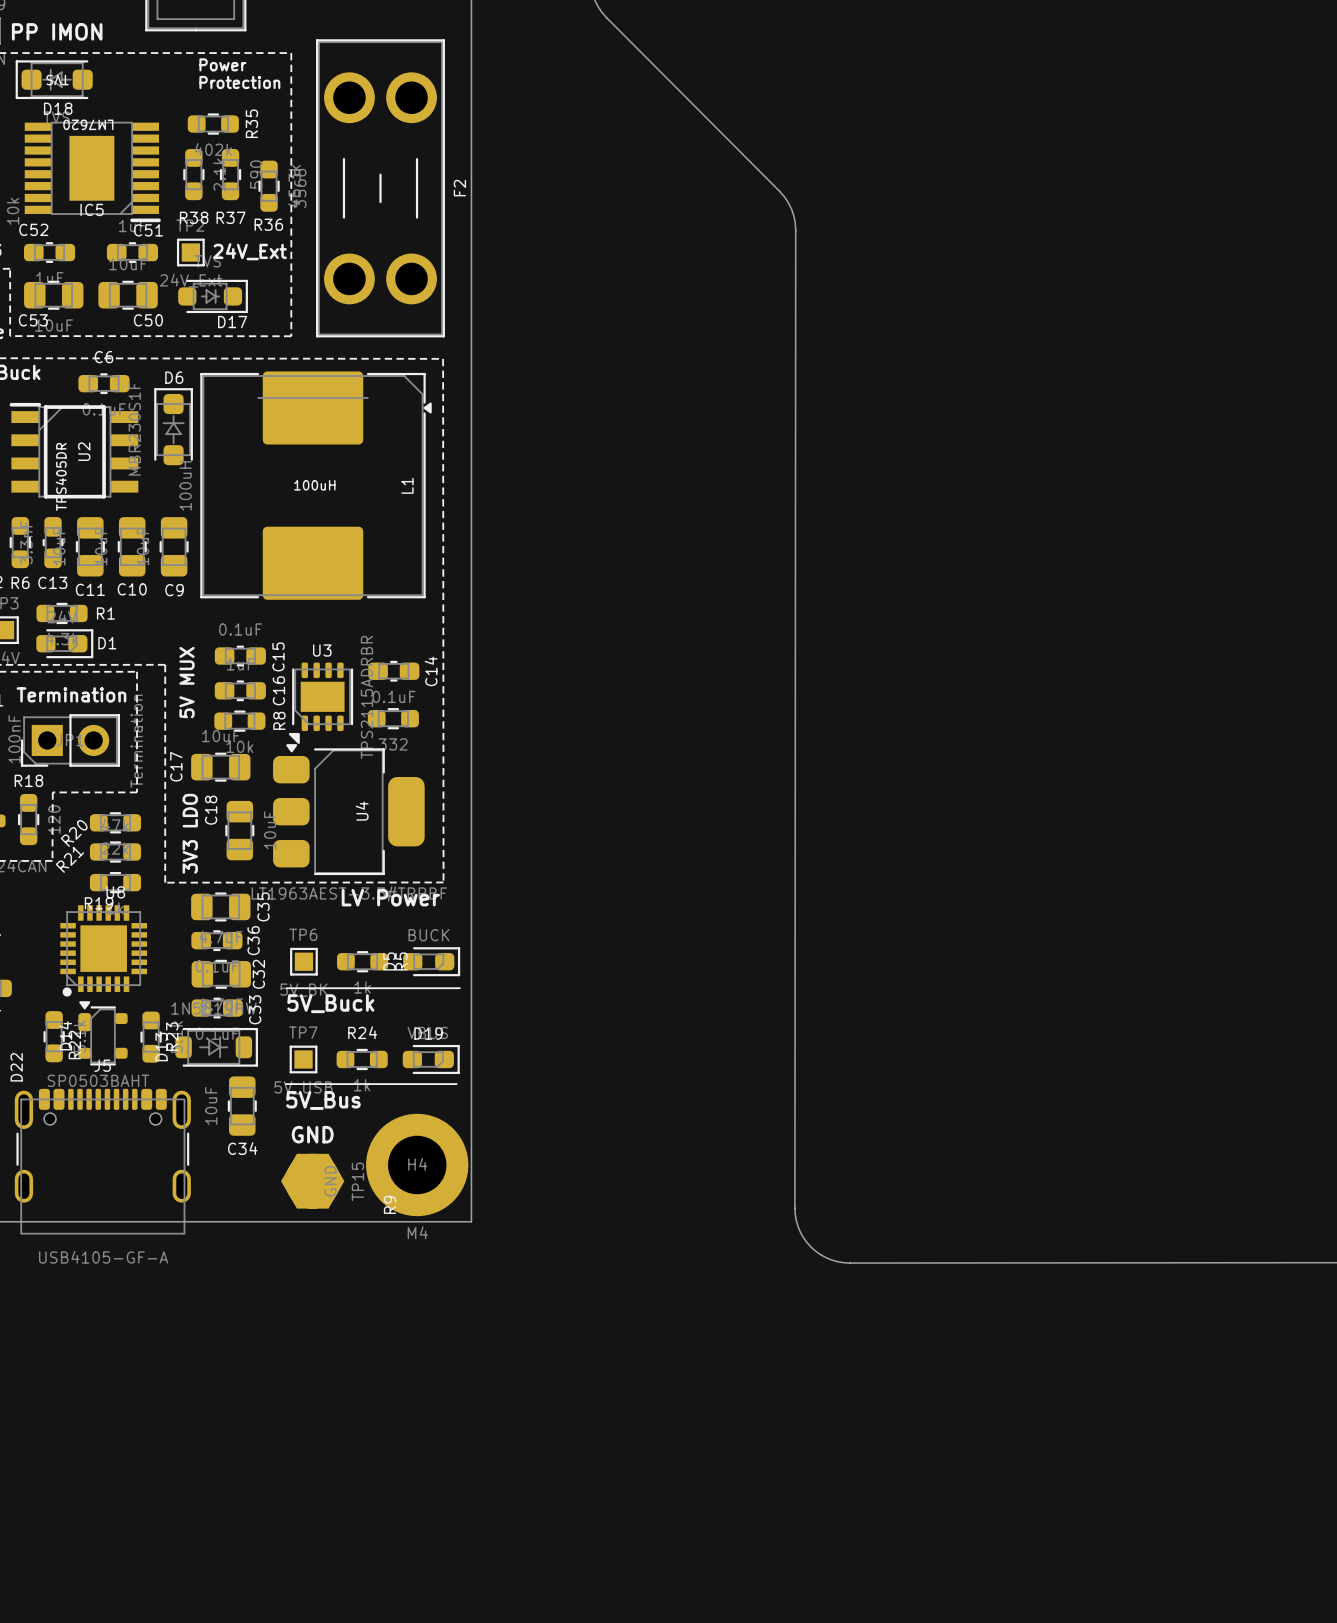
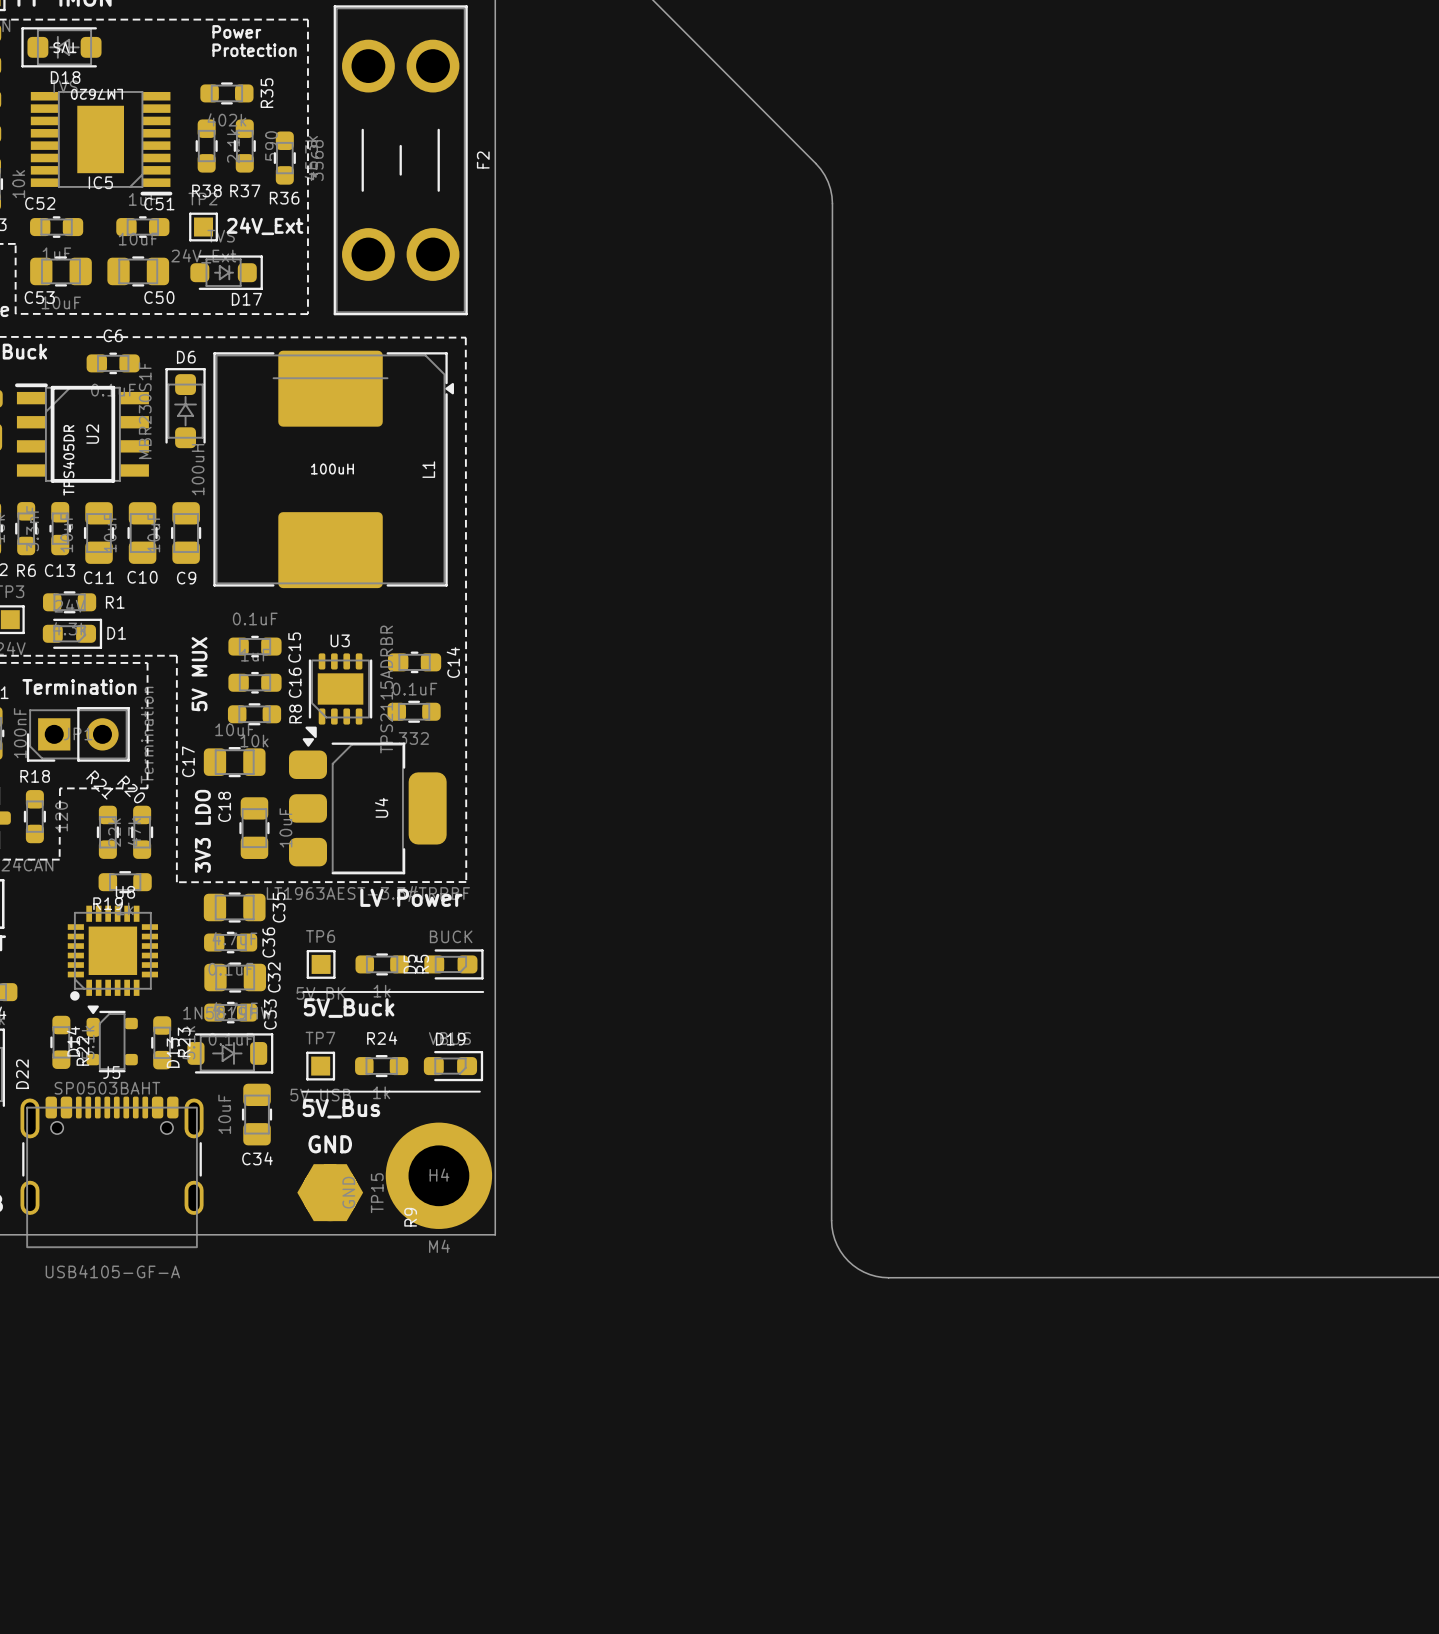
R20 rotation: 0° (115, 822) -> 90° clockwise (142, 832)
R21 rotation: 0° (115, 851) -> 90° clockwise (107, 832)

